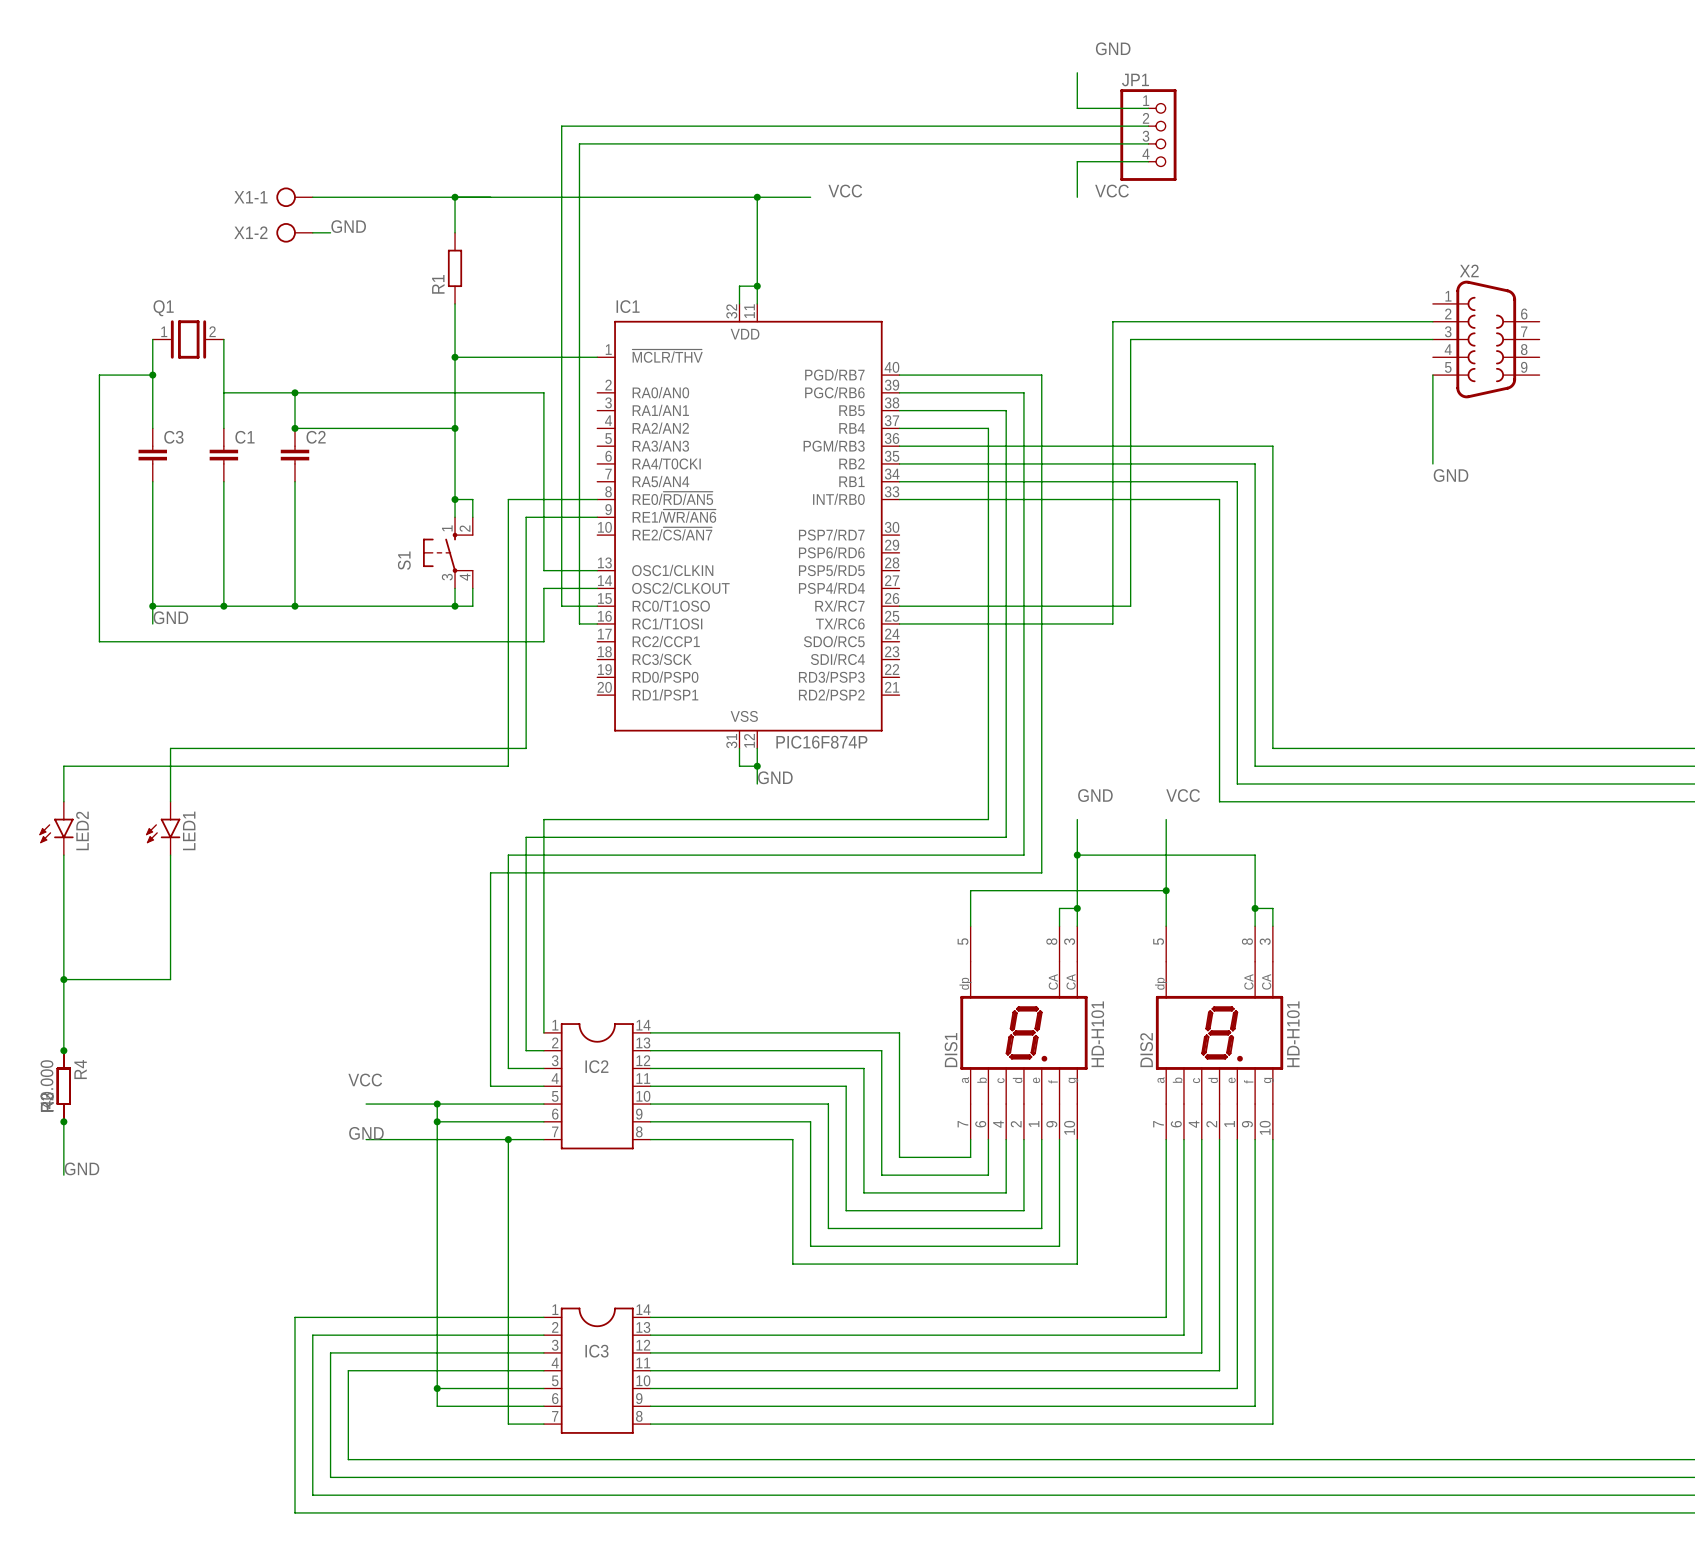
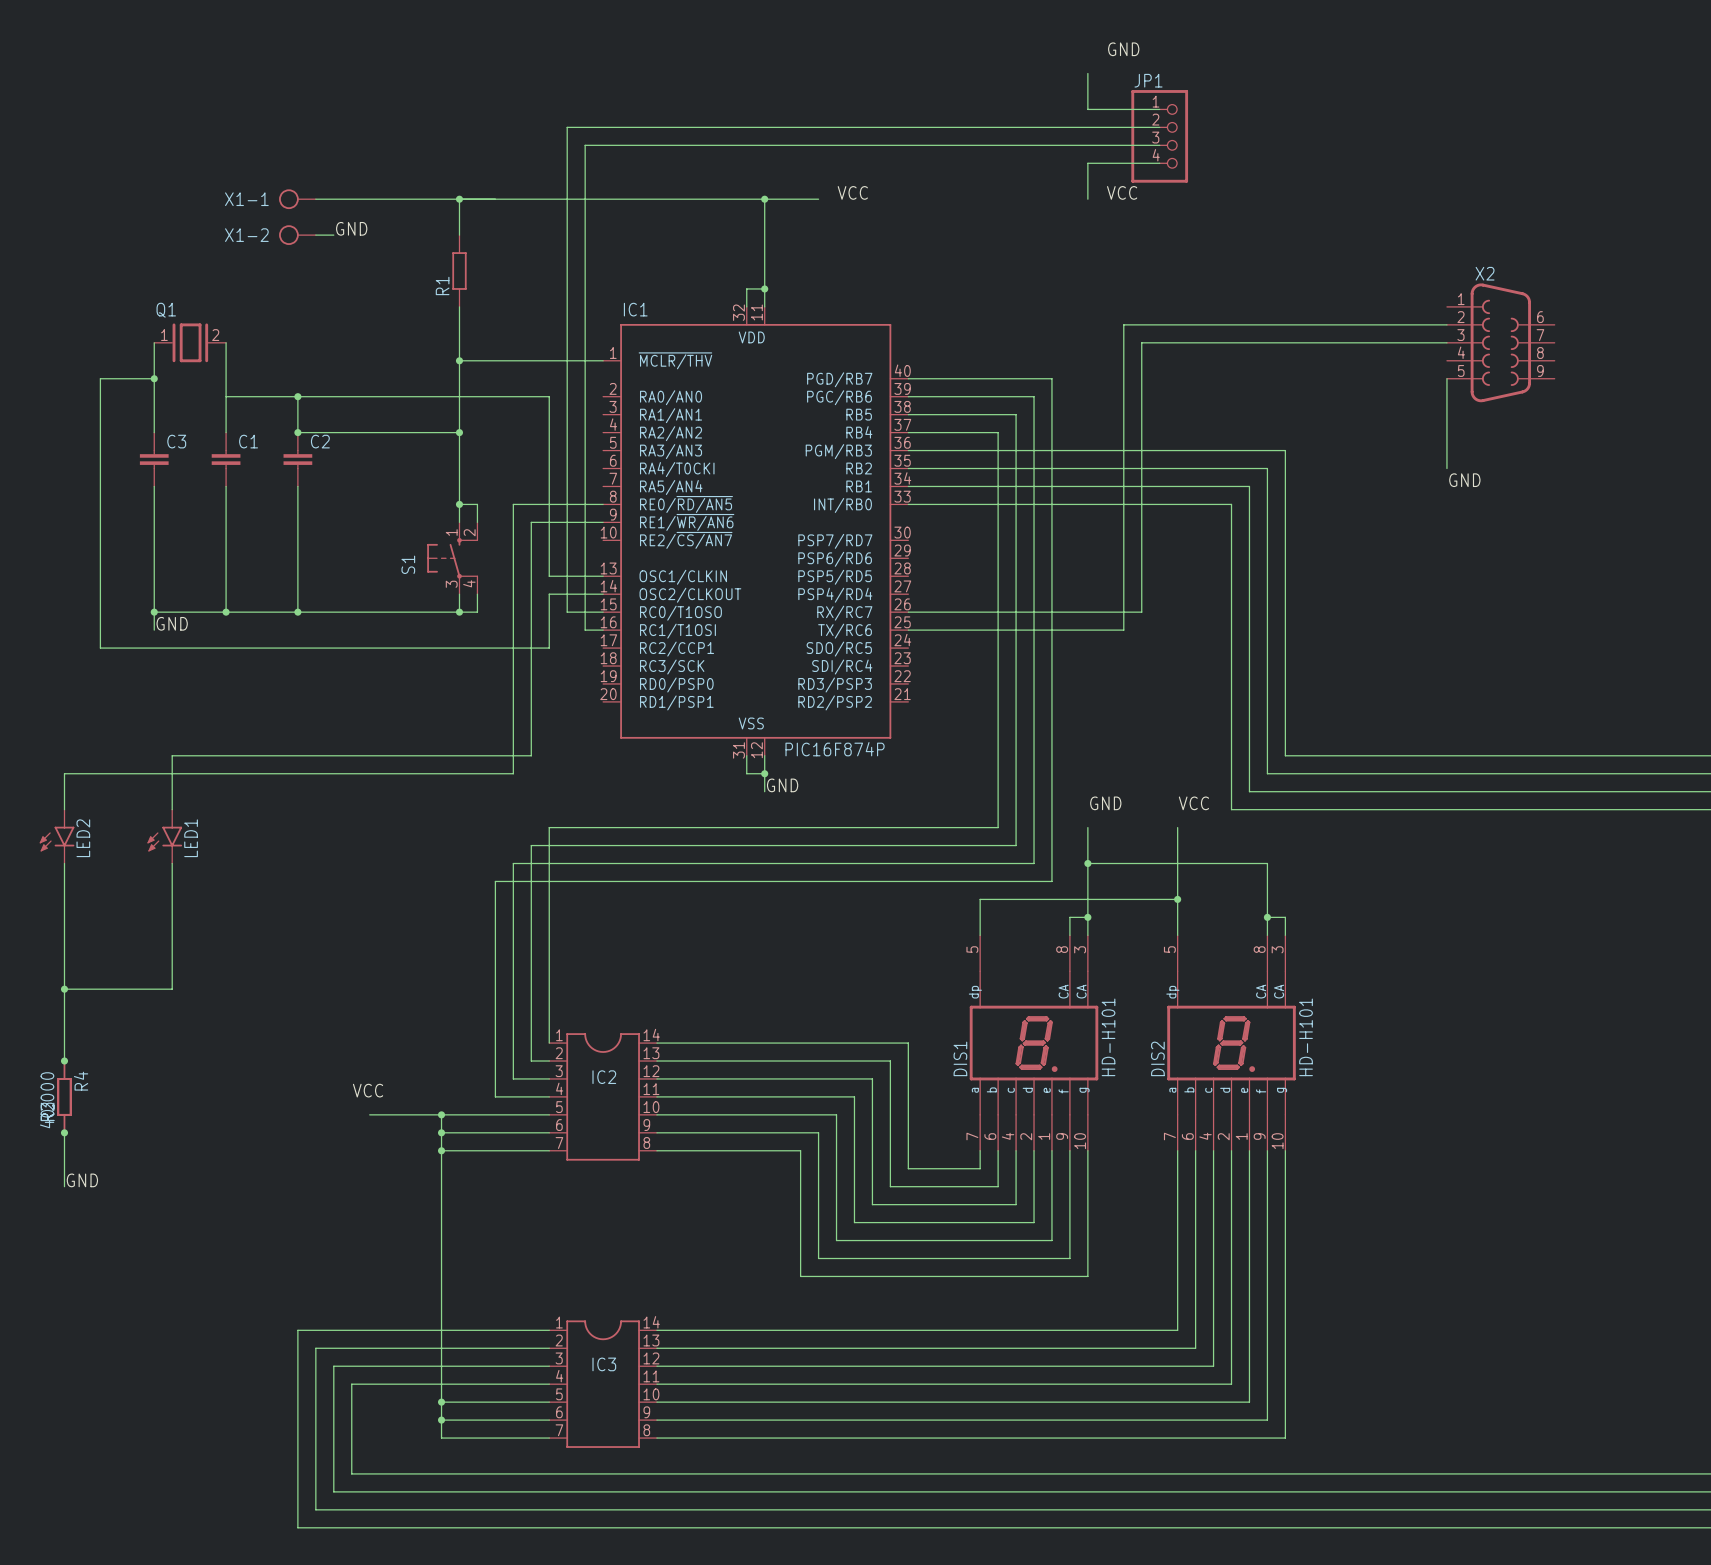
label: GND (366, 1133) -> none
wire: (366, 1139) (437, 1139) -> none
junction: none -> (441, 1150)
wire: (508, 1139) (508, 1424) -> (441, 1420) (441, 1438) (513, 1438)
junction: (508, 1139) -> none
junction: none -> (441, 1420)

